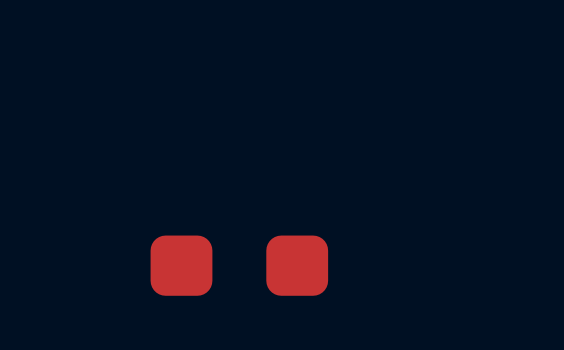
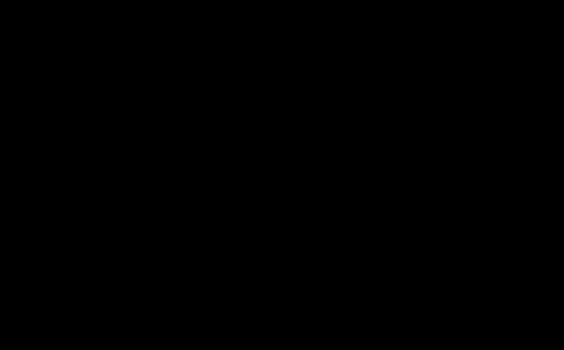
part: (239, 265) -> none

